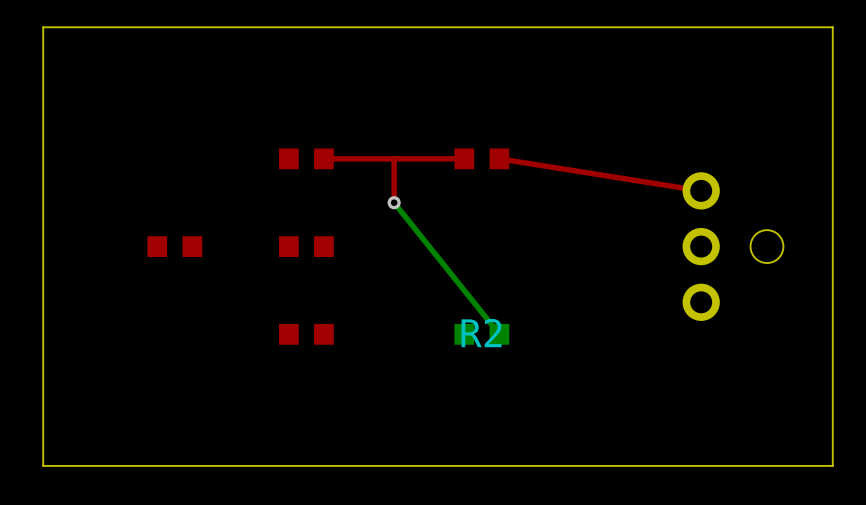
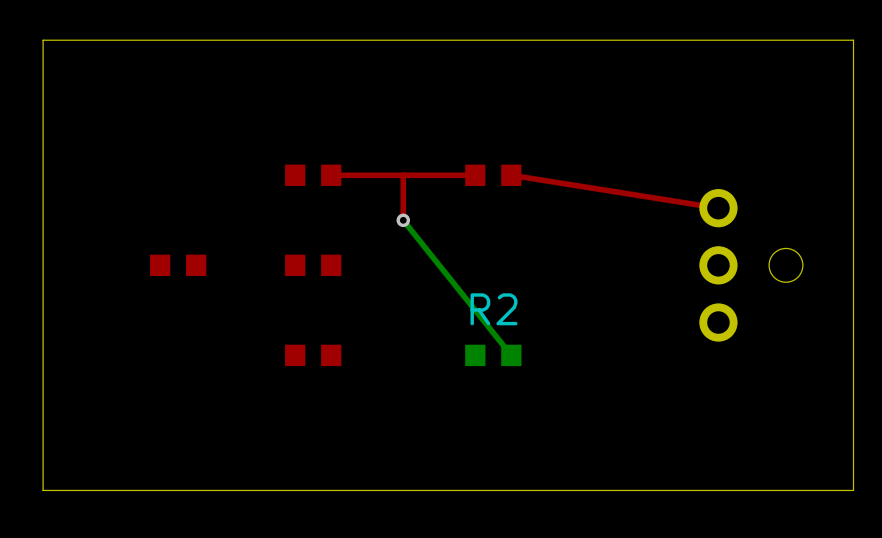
R2 name position: R2 (481, 333) -> R2 (494, 309)

